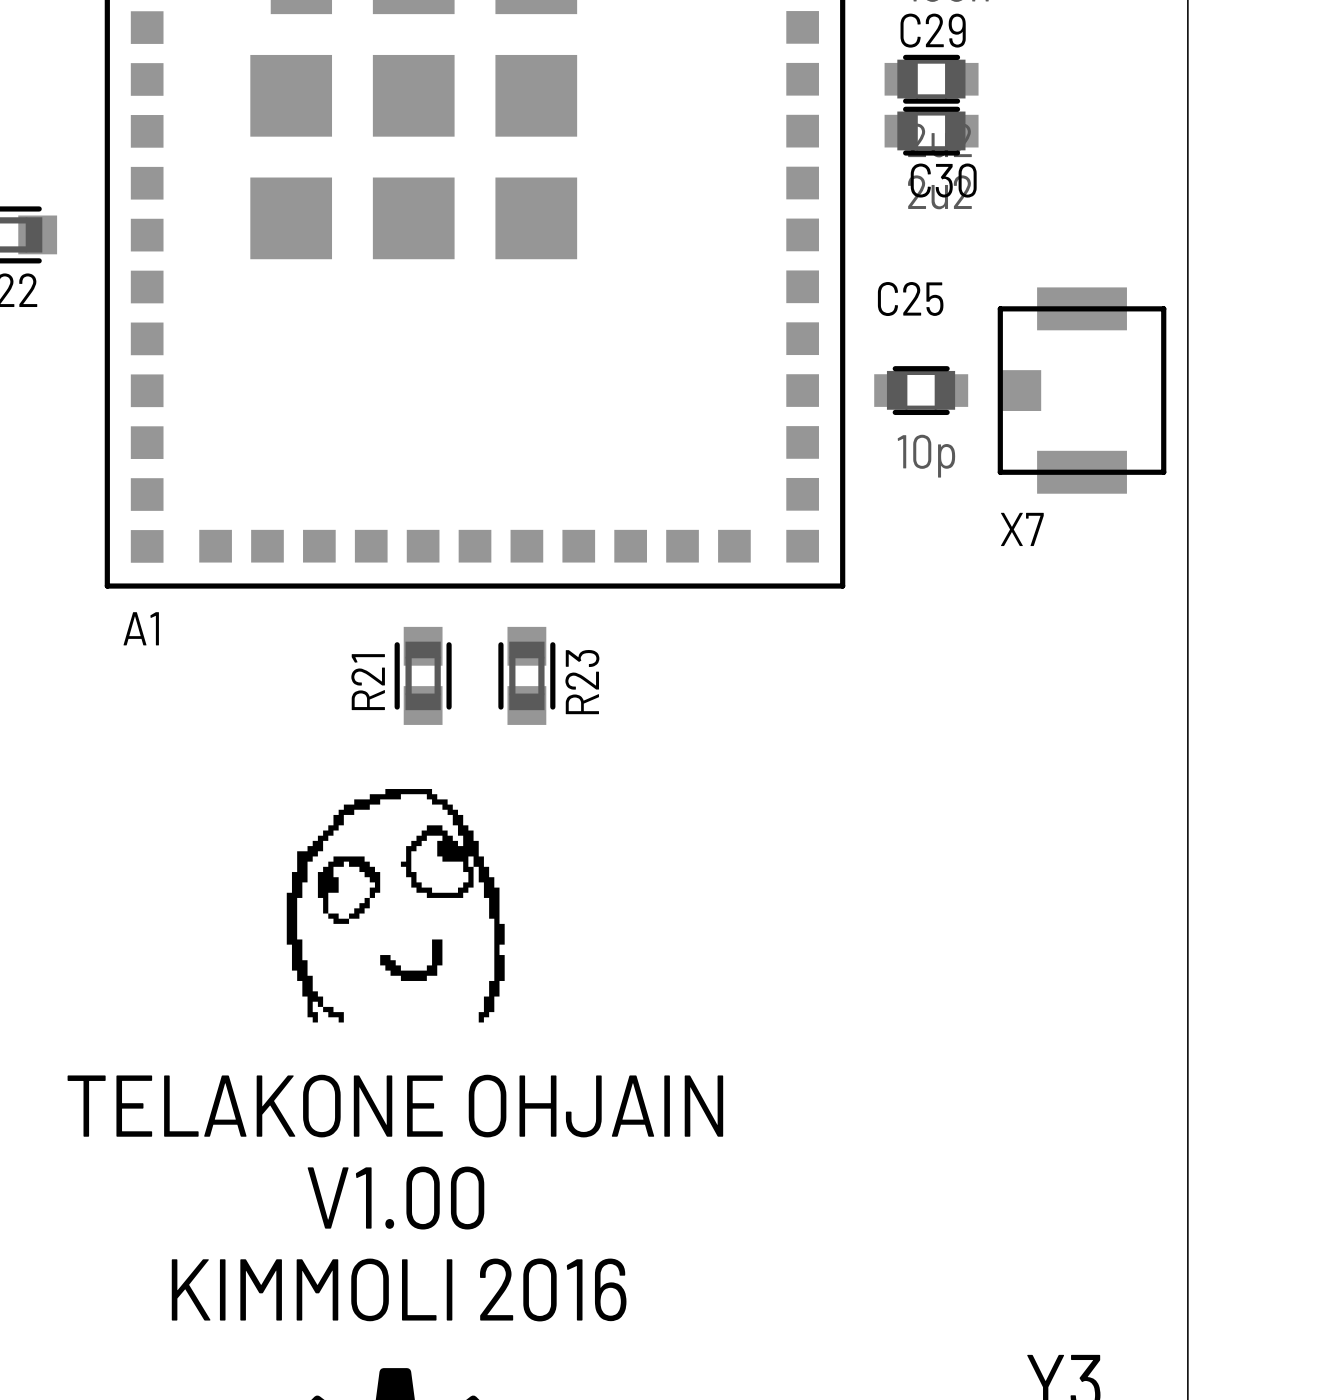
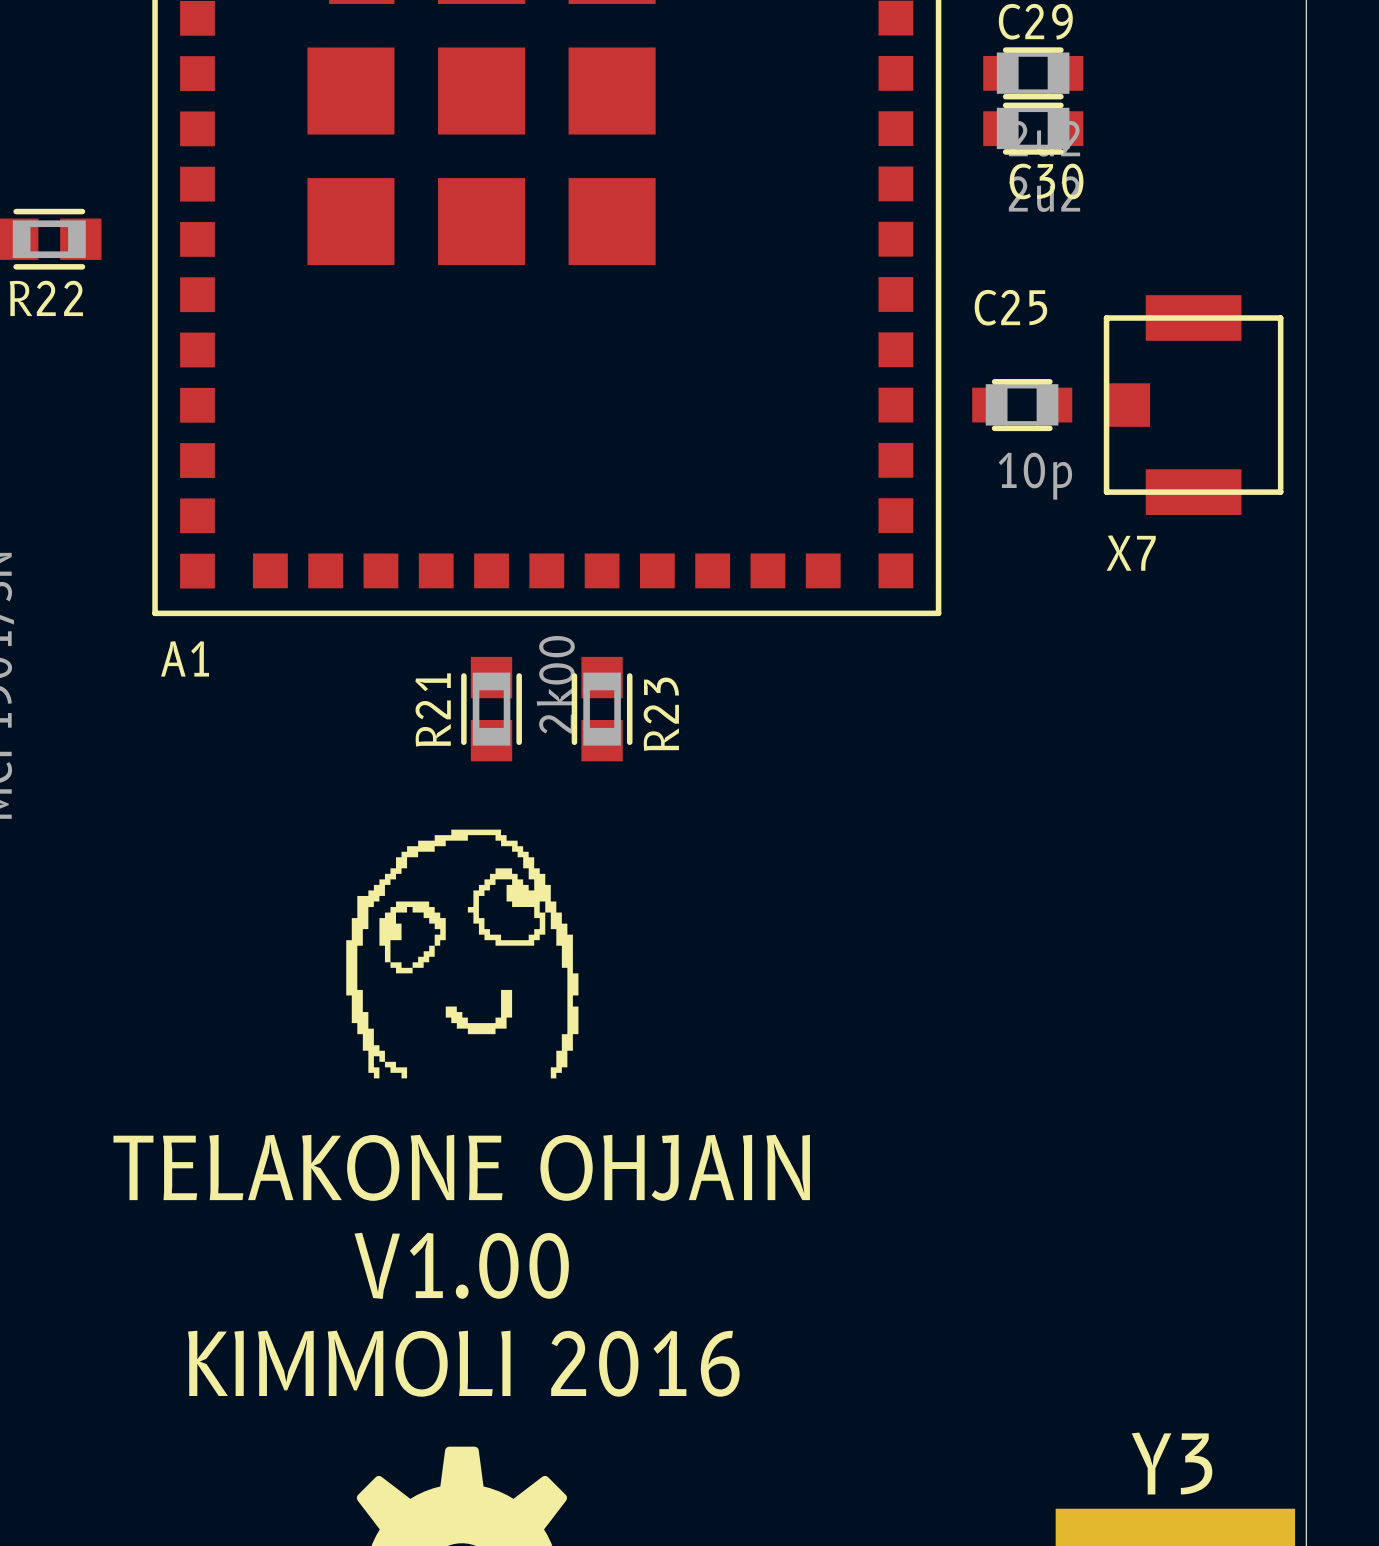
R21 value: none -> 2k00 (555, 684)

